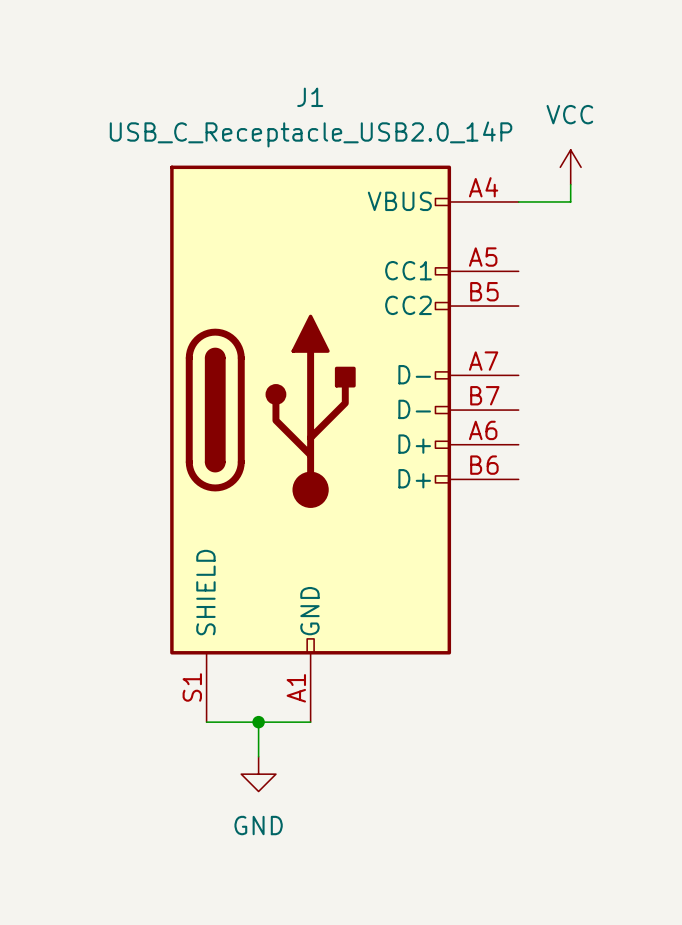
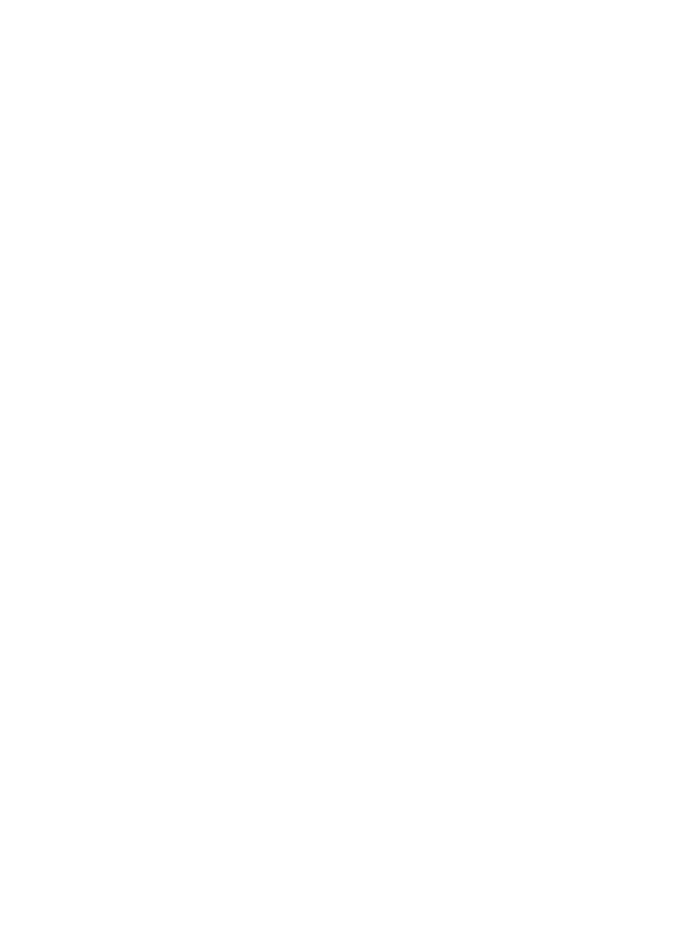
power symbol: VCC (570, 167) -> none
wire: (570, 184) (570, 201) (518, 201) -> none
J1: USB_C_Receptacle_USB2.0_14P (344, 443) -> none
wire: (206, 722) (310, 722) -> none
wire: (258, 722) (258, 756) -> none
junction: (258, 722) -> none
power symbol: GND (258, 774) -> none

